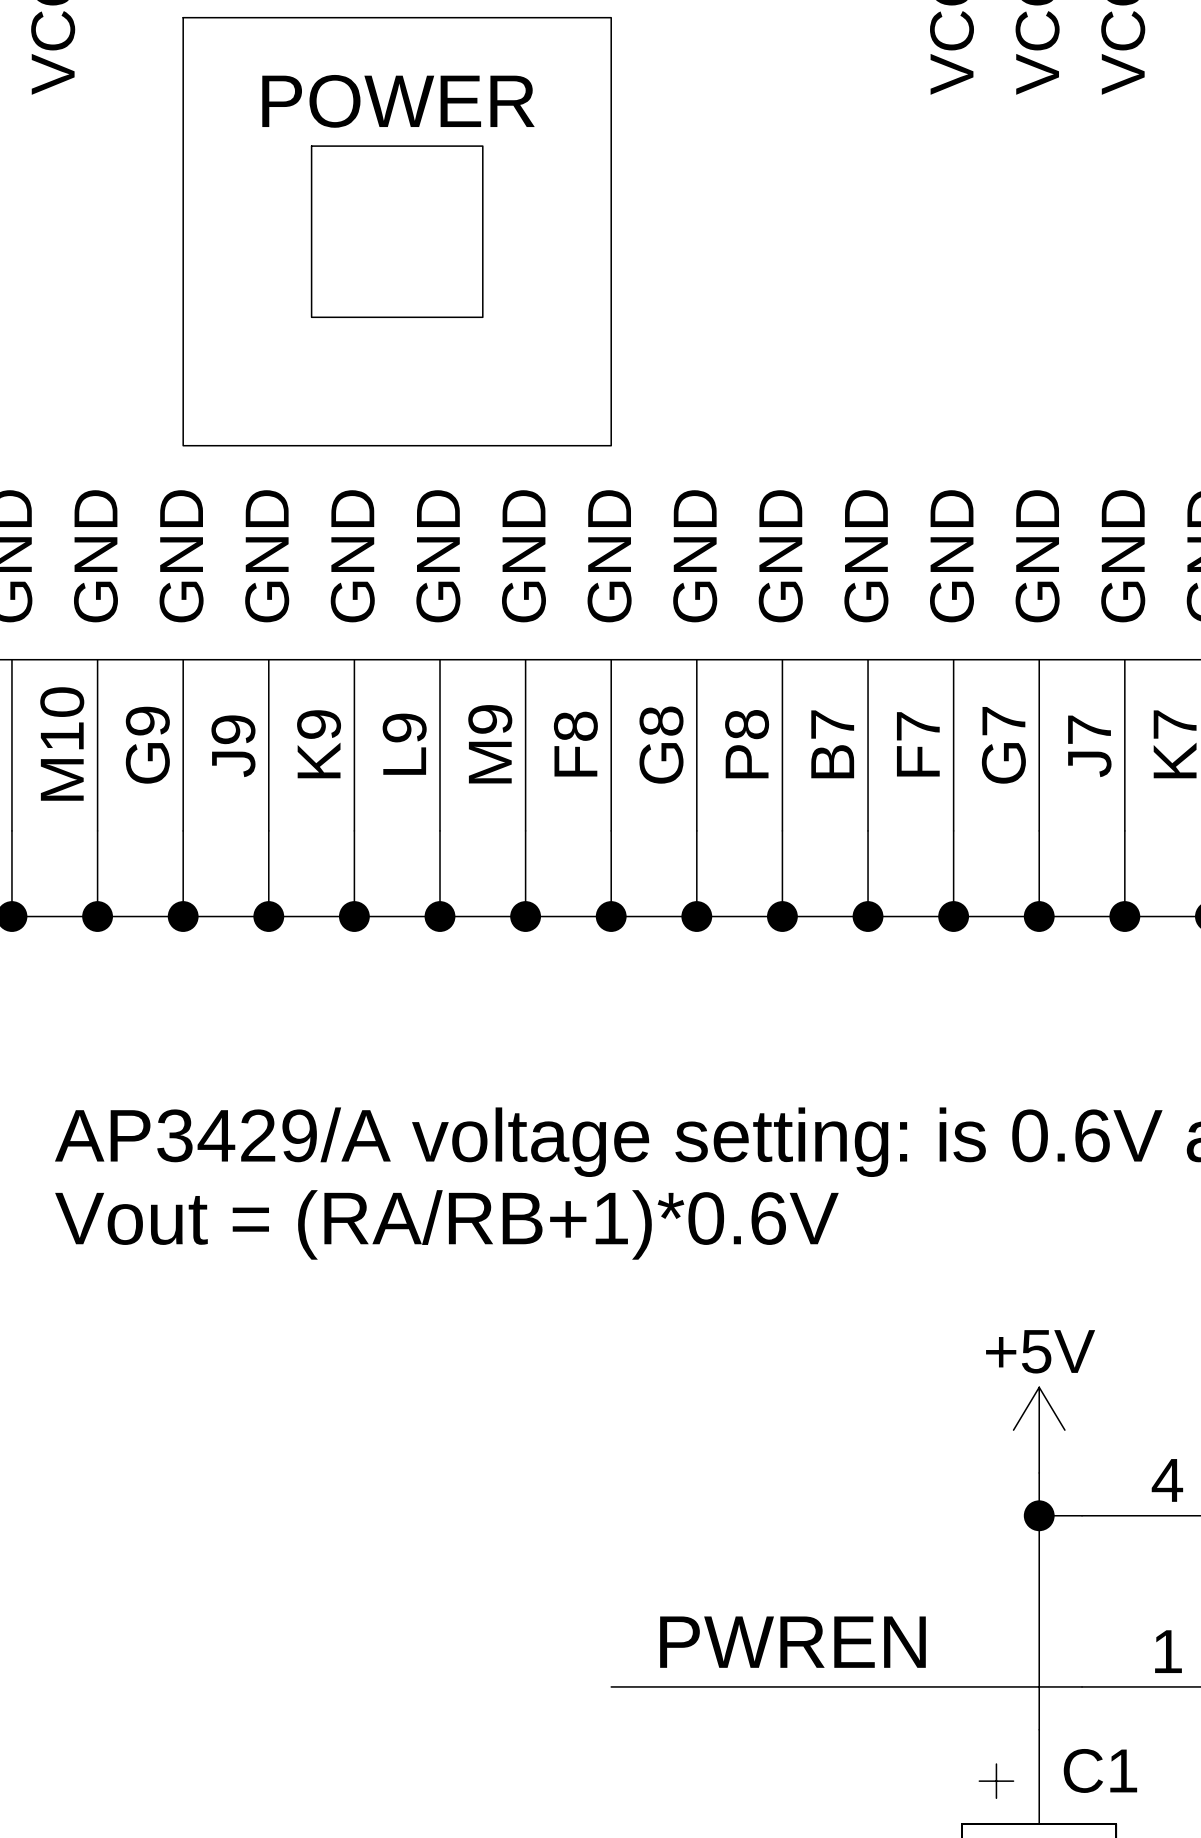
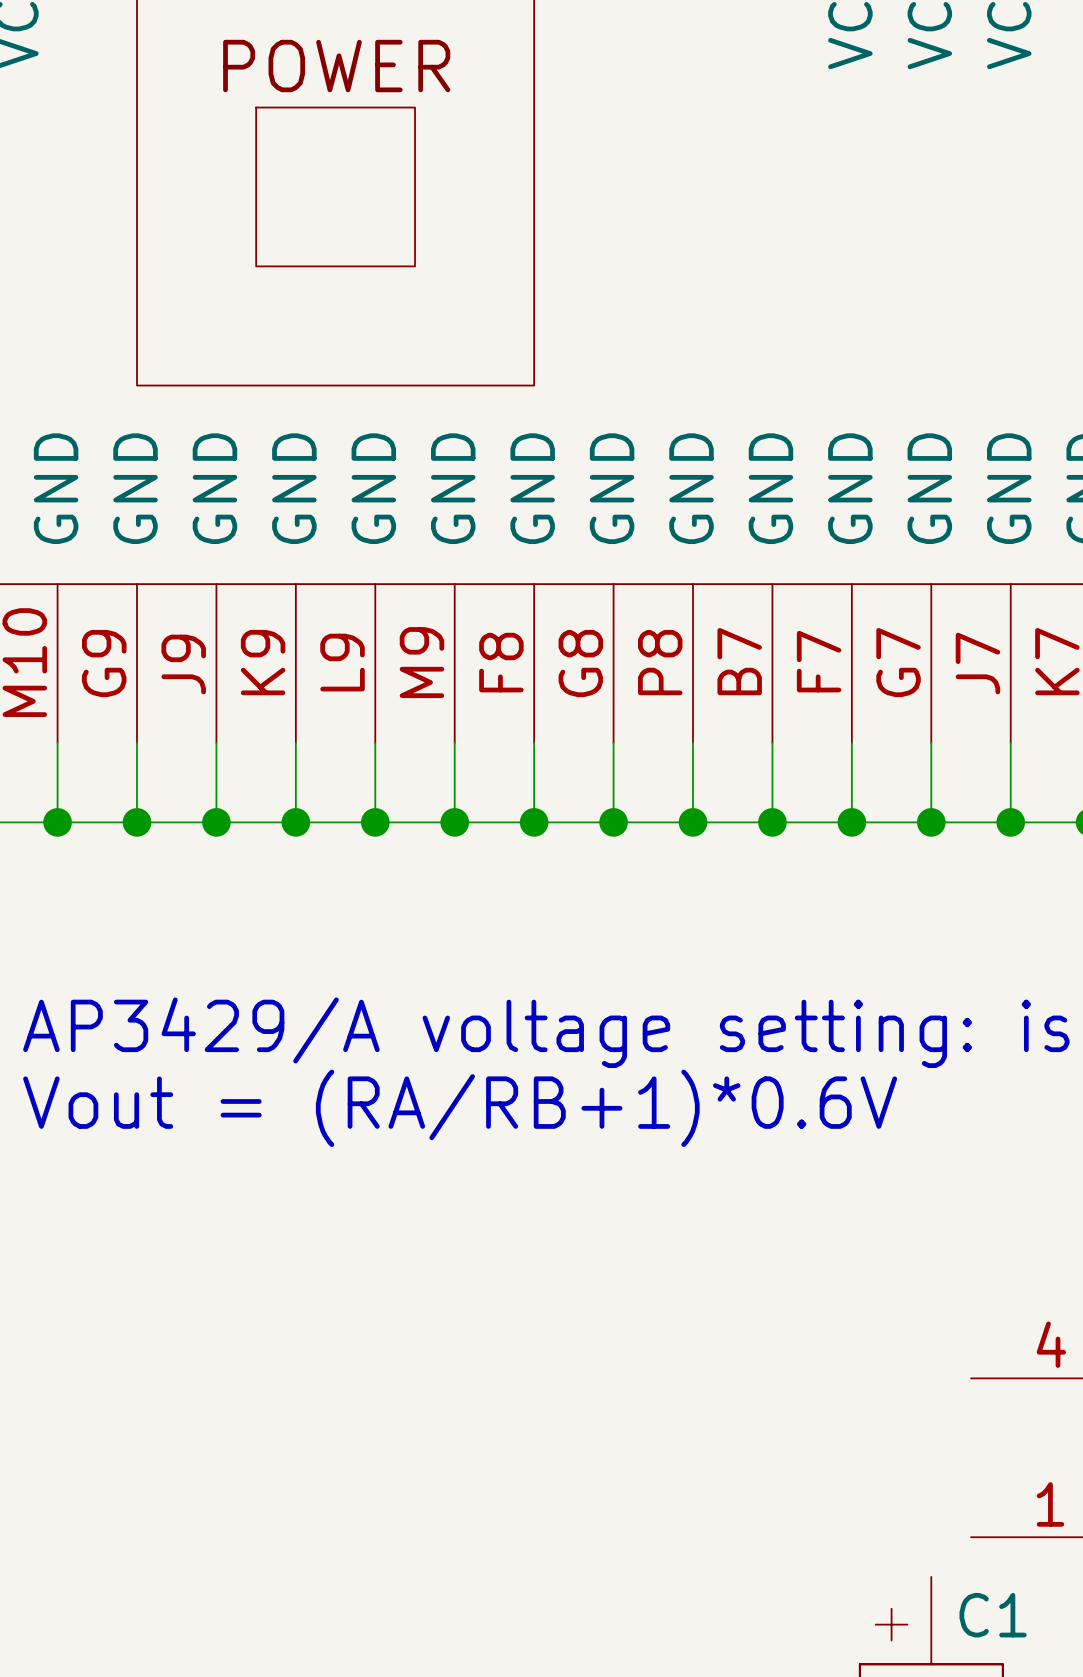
power symbol: +5V (1039, 1430) -> none
wire: (1039, 1472) (1039, 1729) -> none
wire: (1039, 1515) (1082, 1515) -> none
junction: (1039, 1515) -> none
label: PWREN (792, 1642) -> none
wire: (611, 1686) (1082, 1686) -> none

